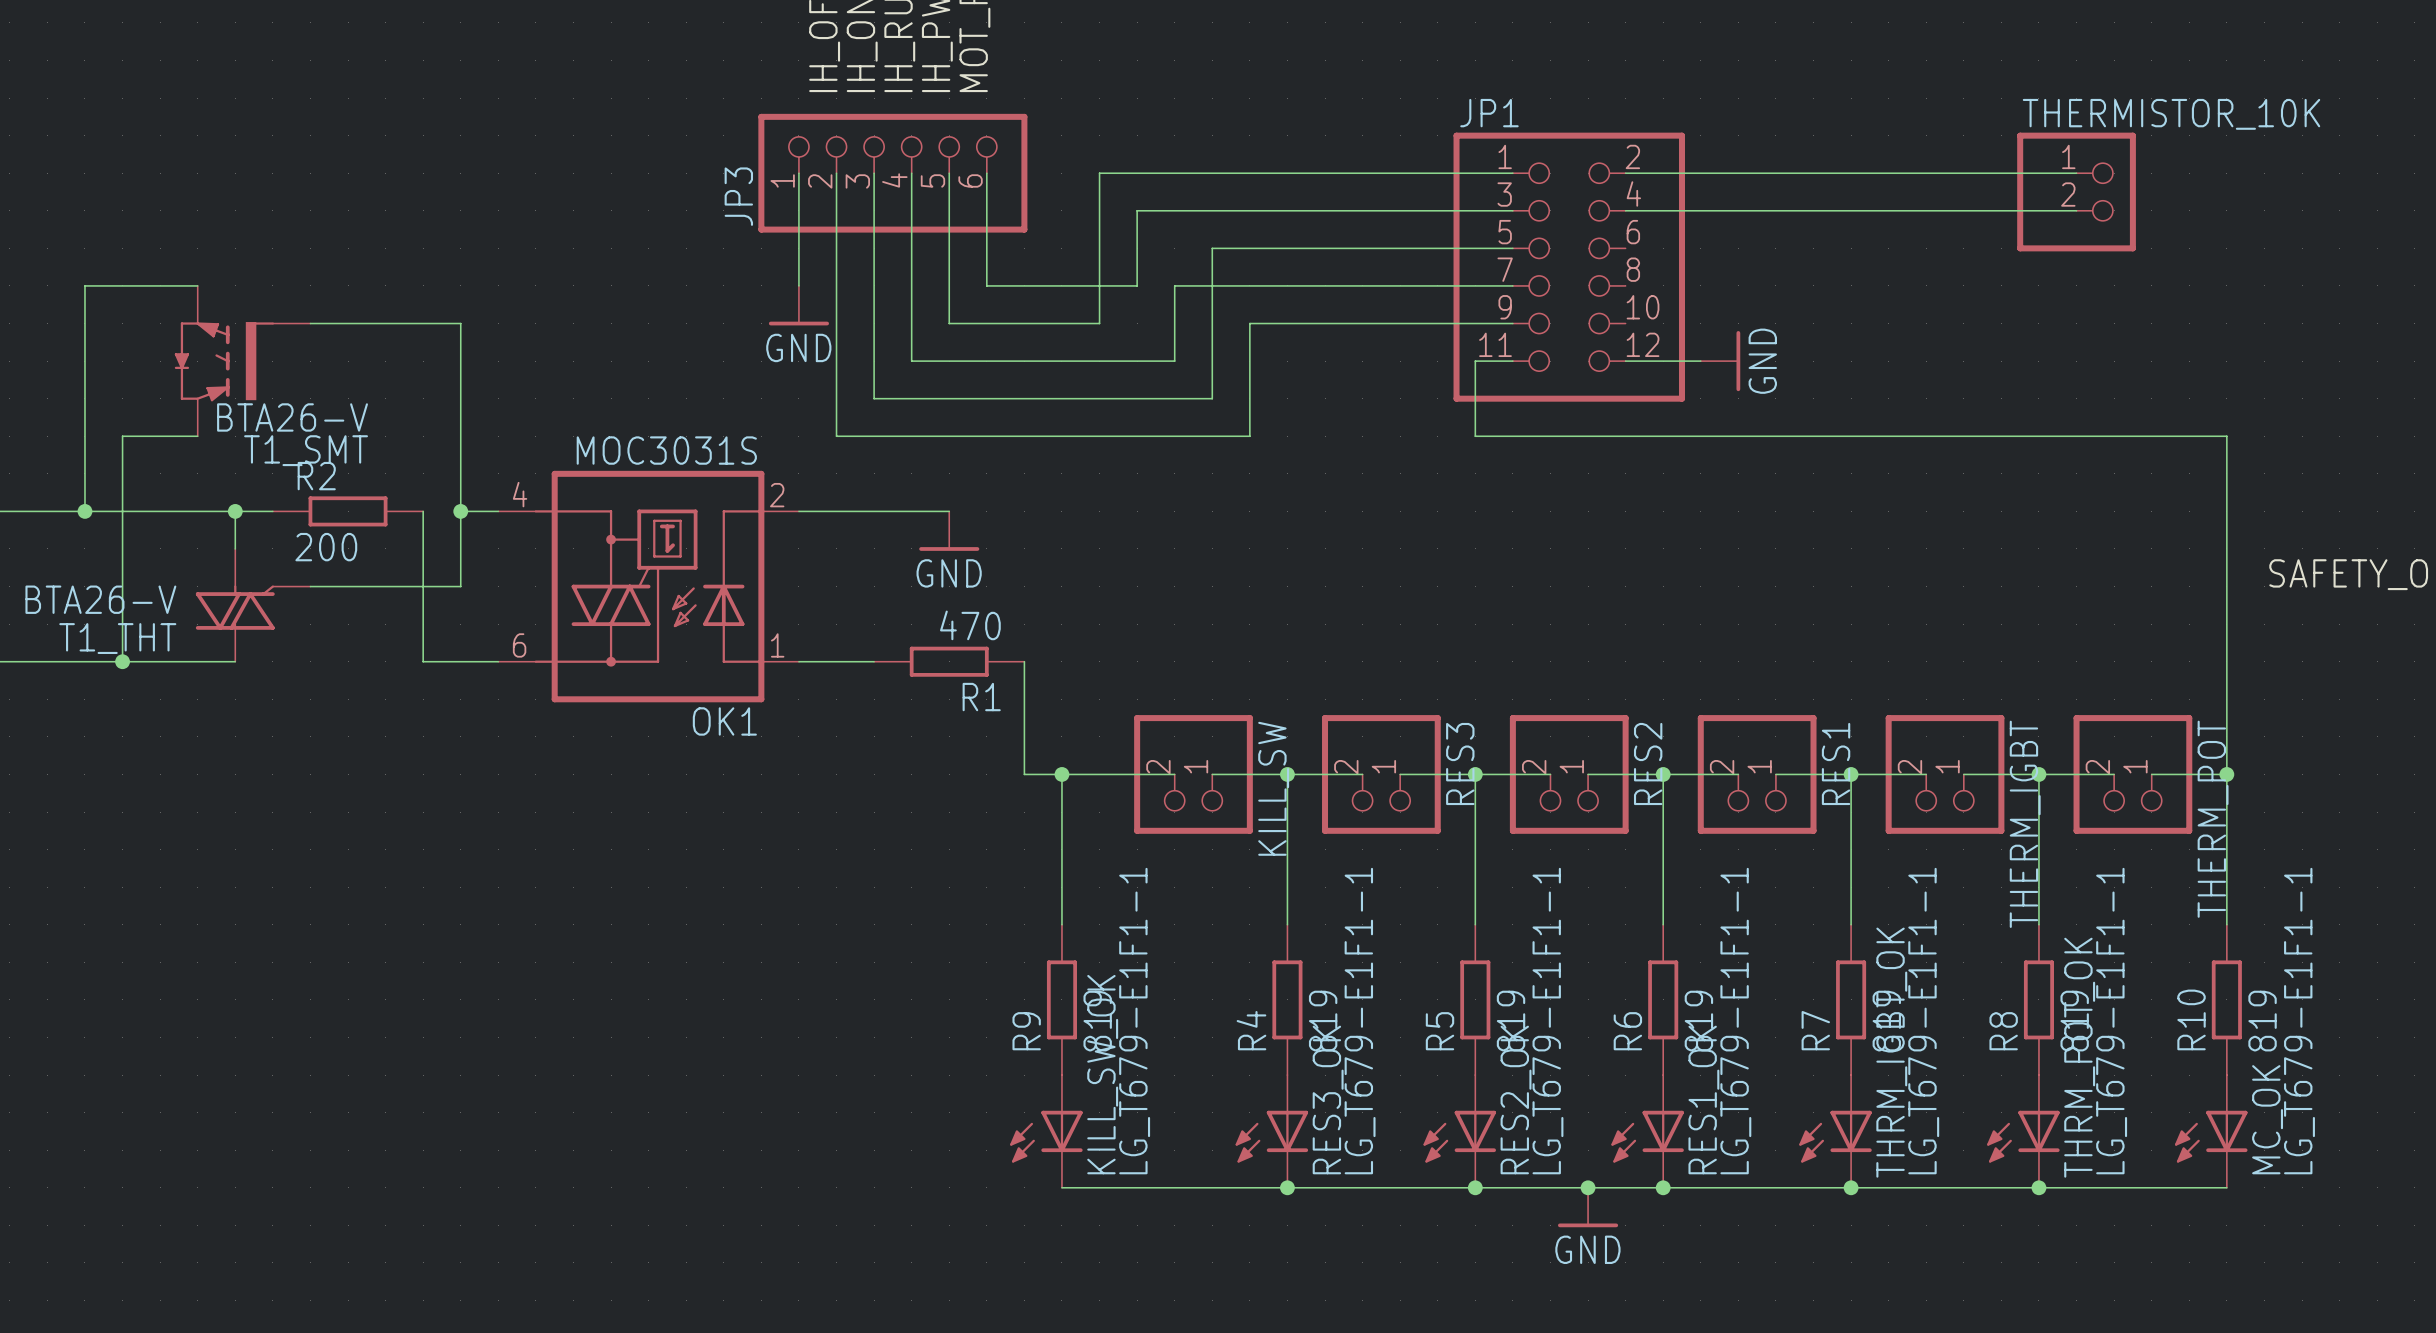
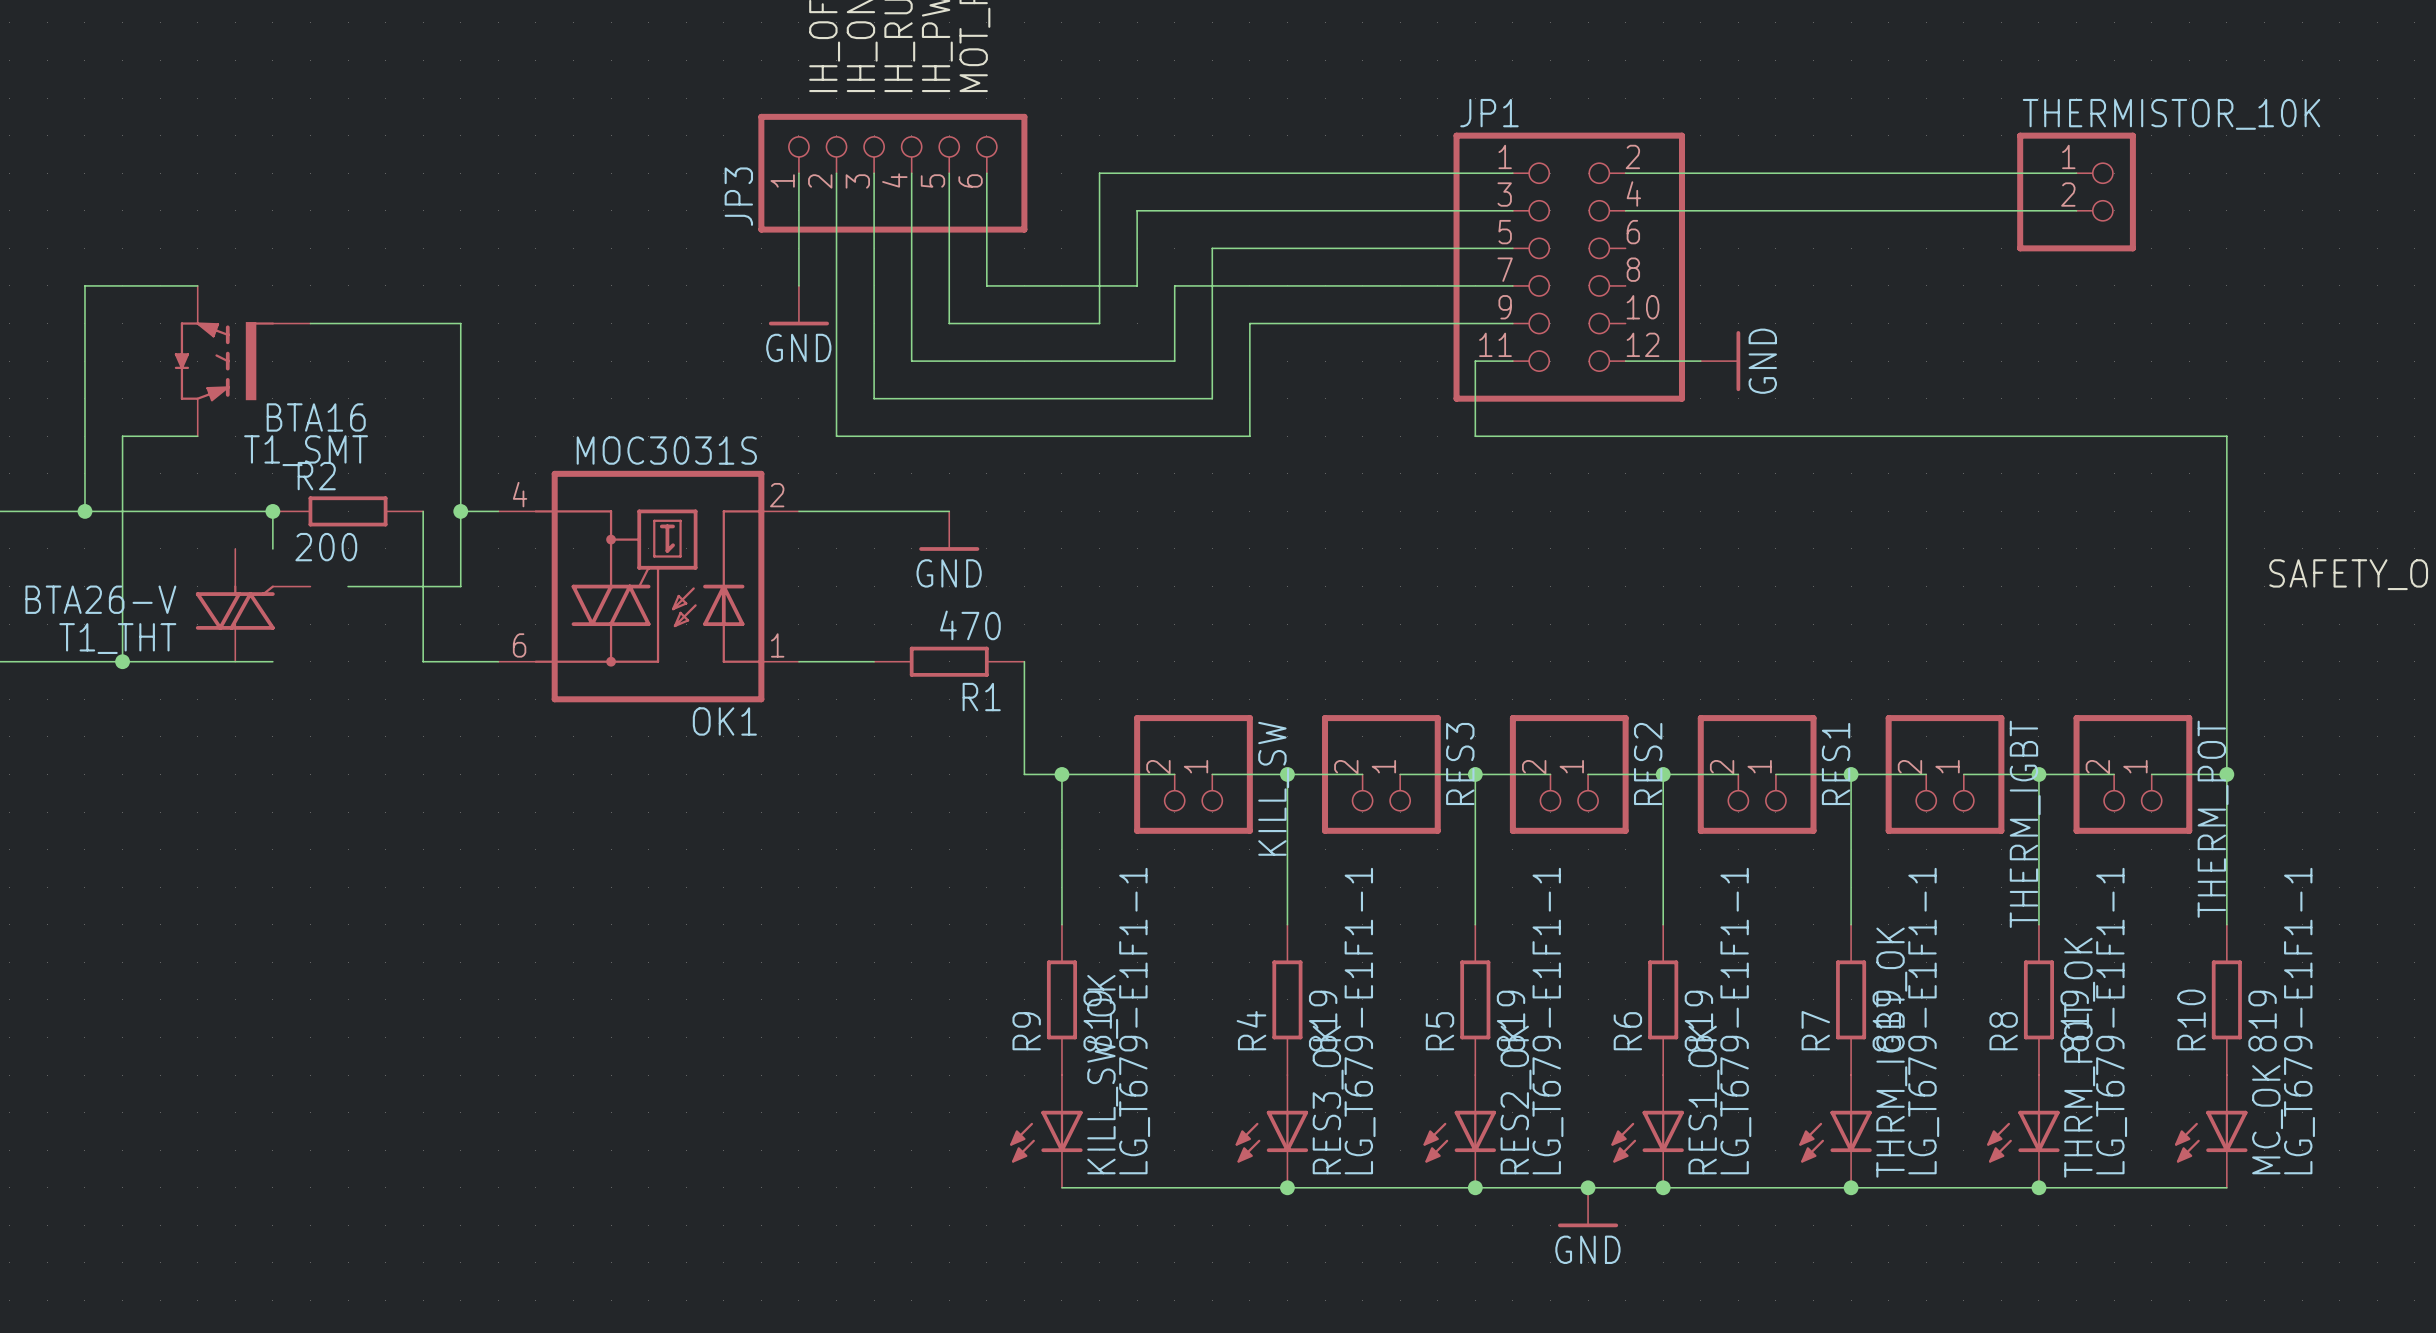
T1_SMT value: BTA26-V (292, 417) -> BTA16 (316, 417)
wire: (235, 511) (235, 548) -> (272, 511) (272, 548)
junction position: (235, 511) -> (272, 511)
wire: (310, 586) (348, 586) -> (235, 661) (272, 661)

